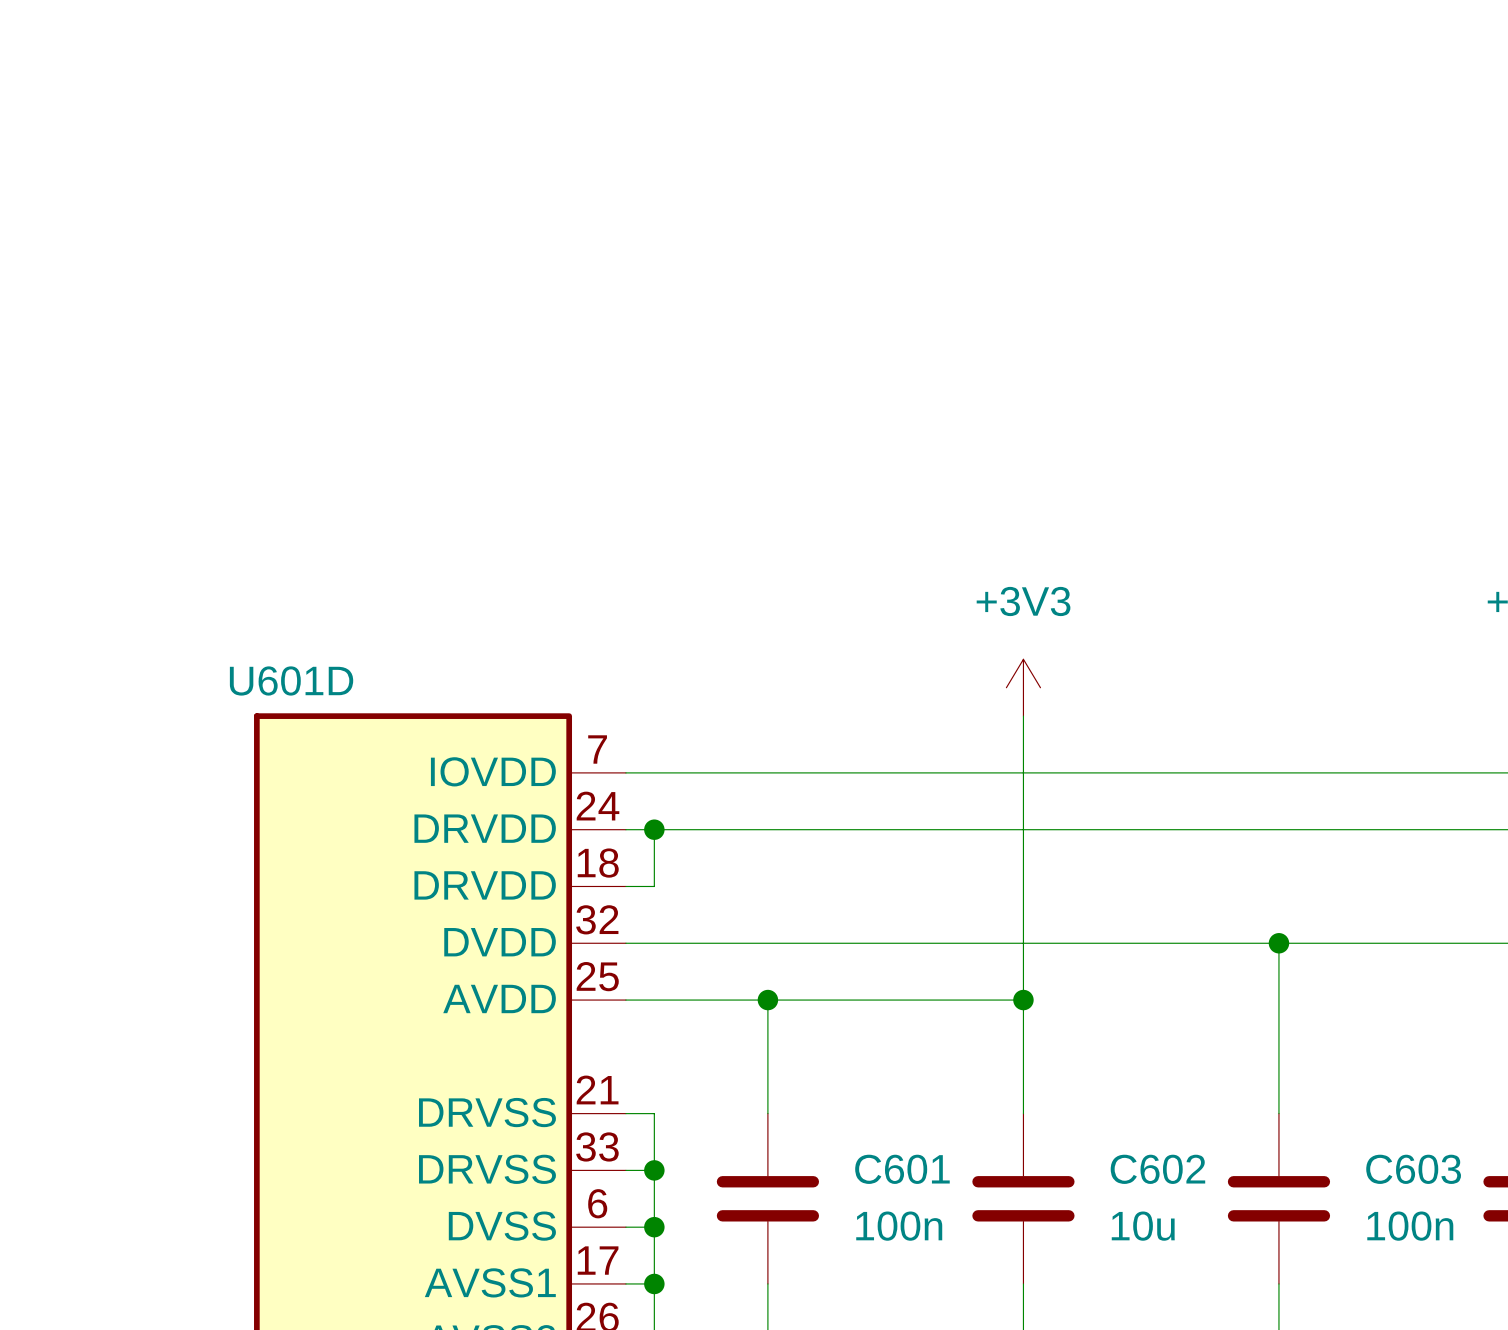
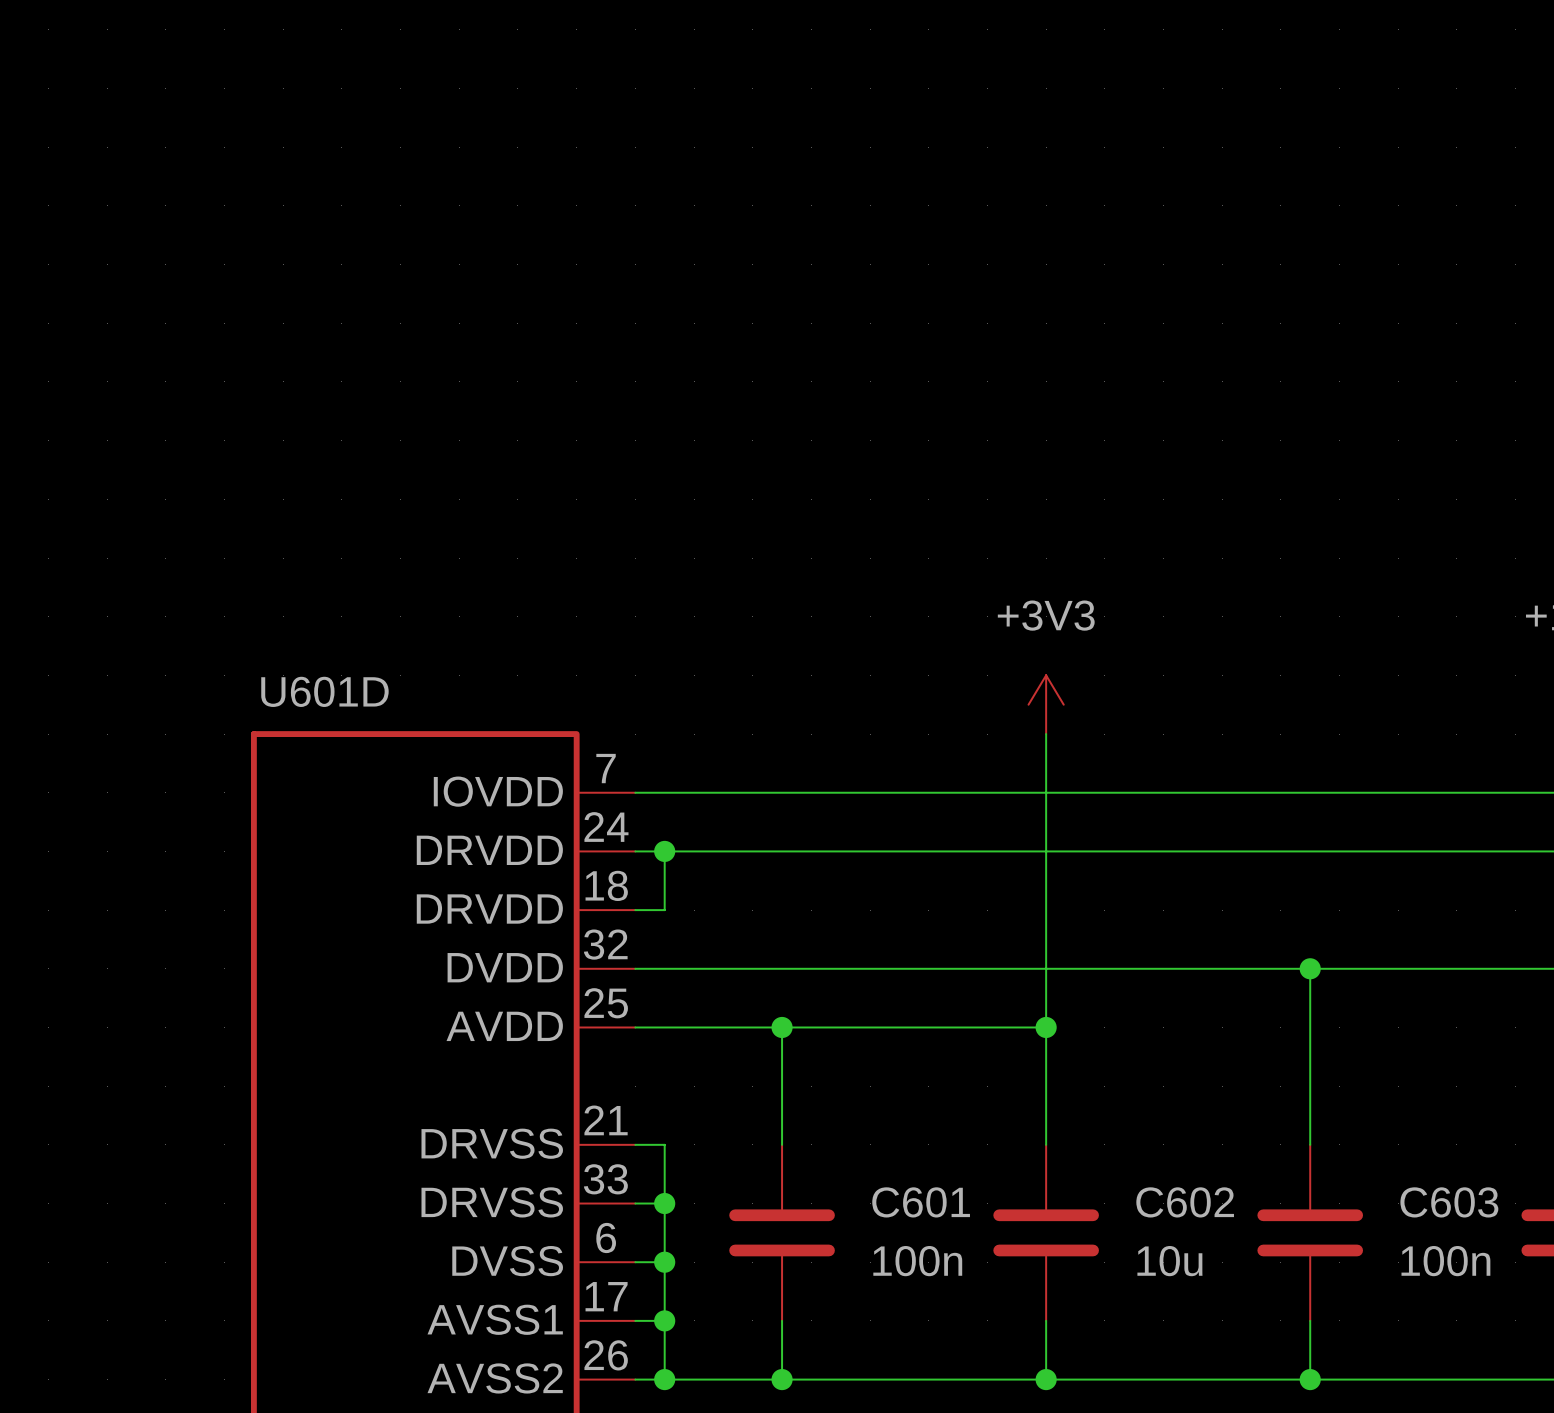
U601D name position: U601D (291, 680) -> U601D (324, 691)

